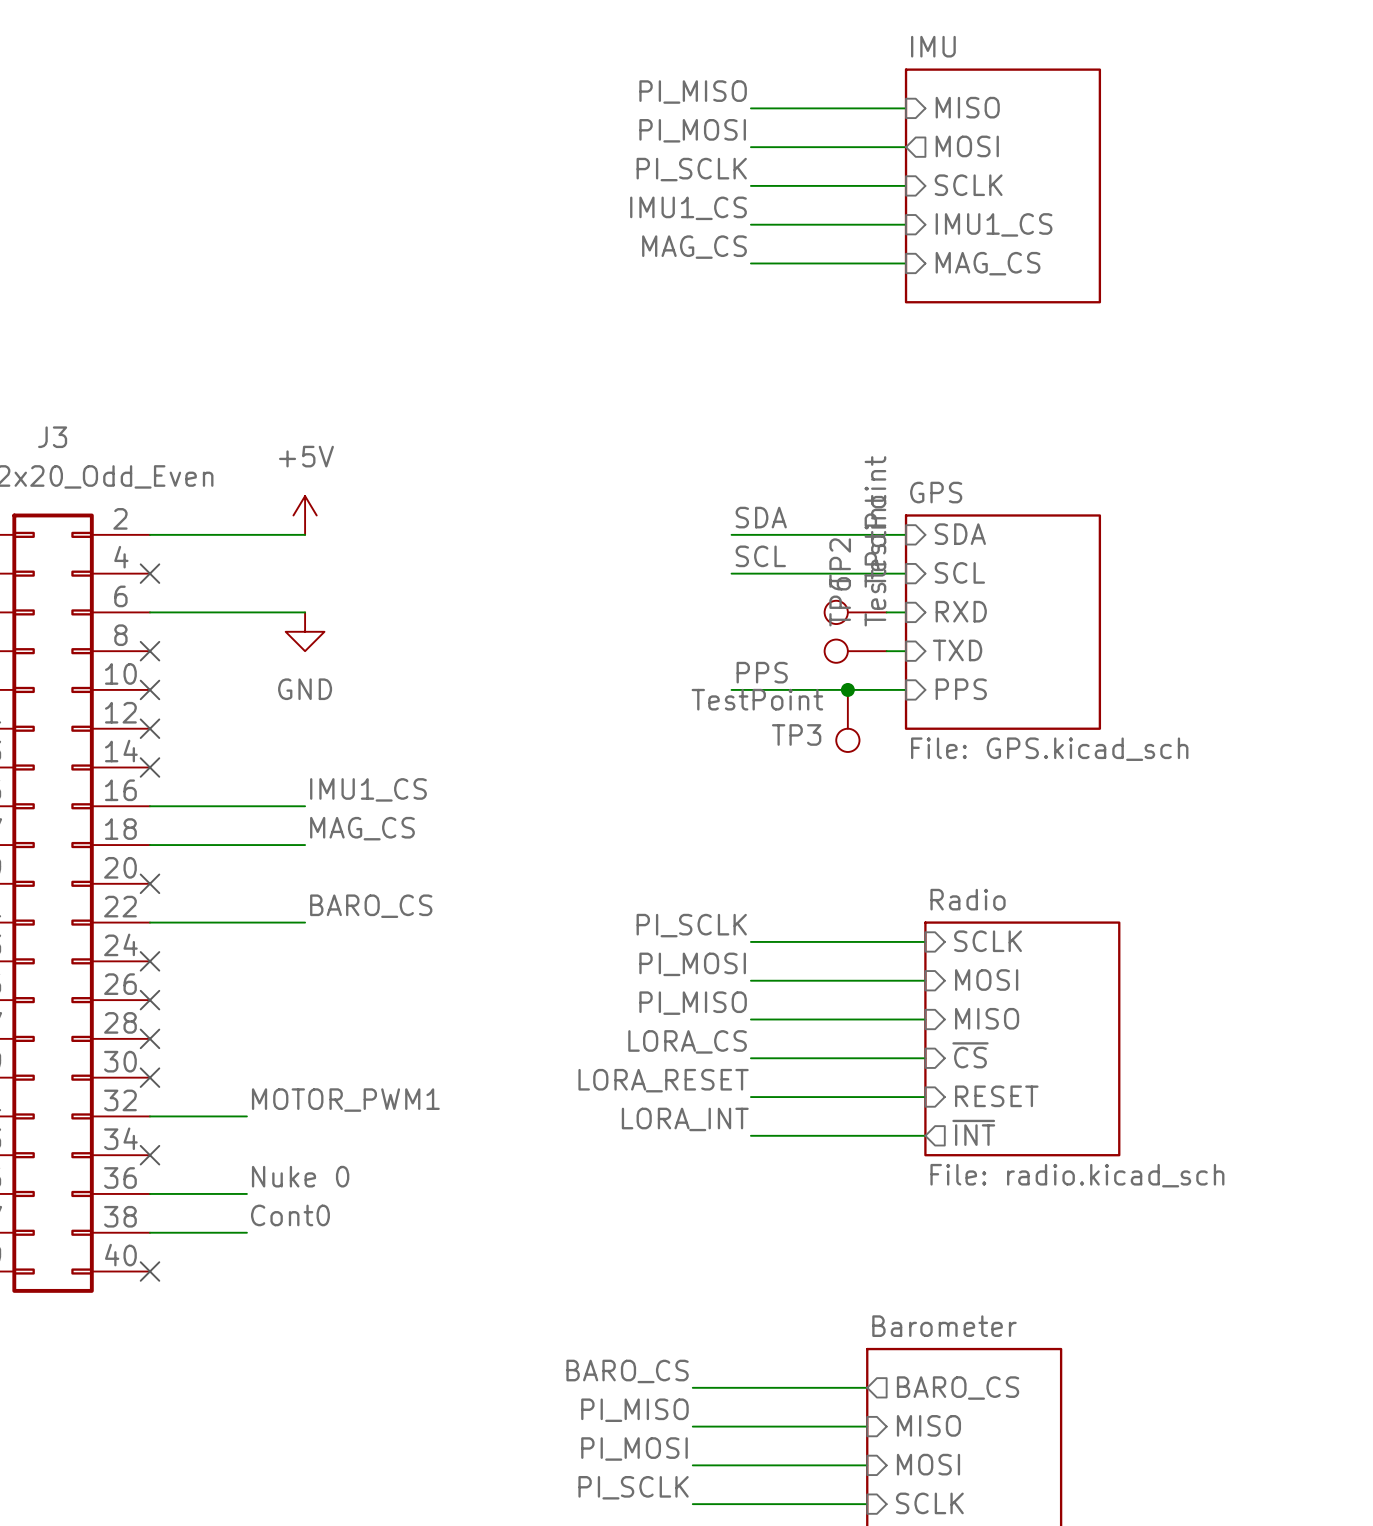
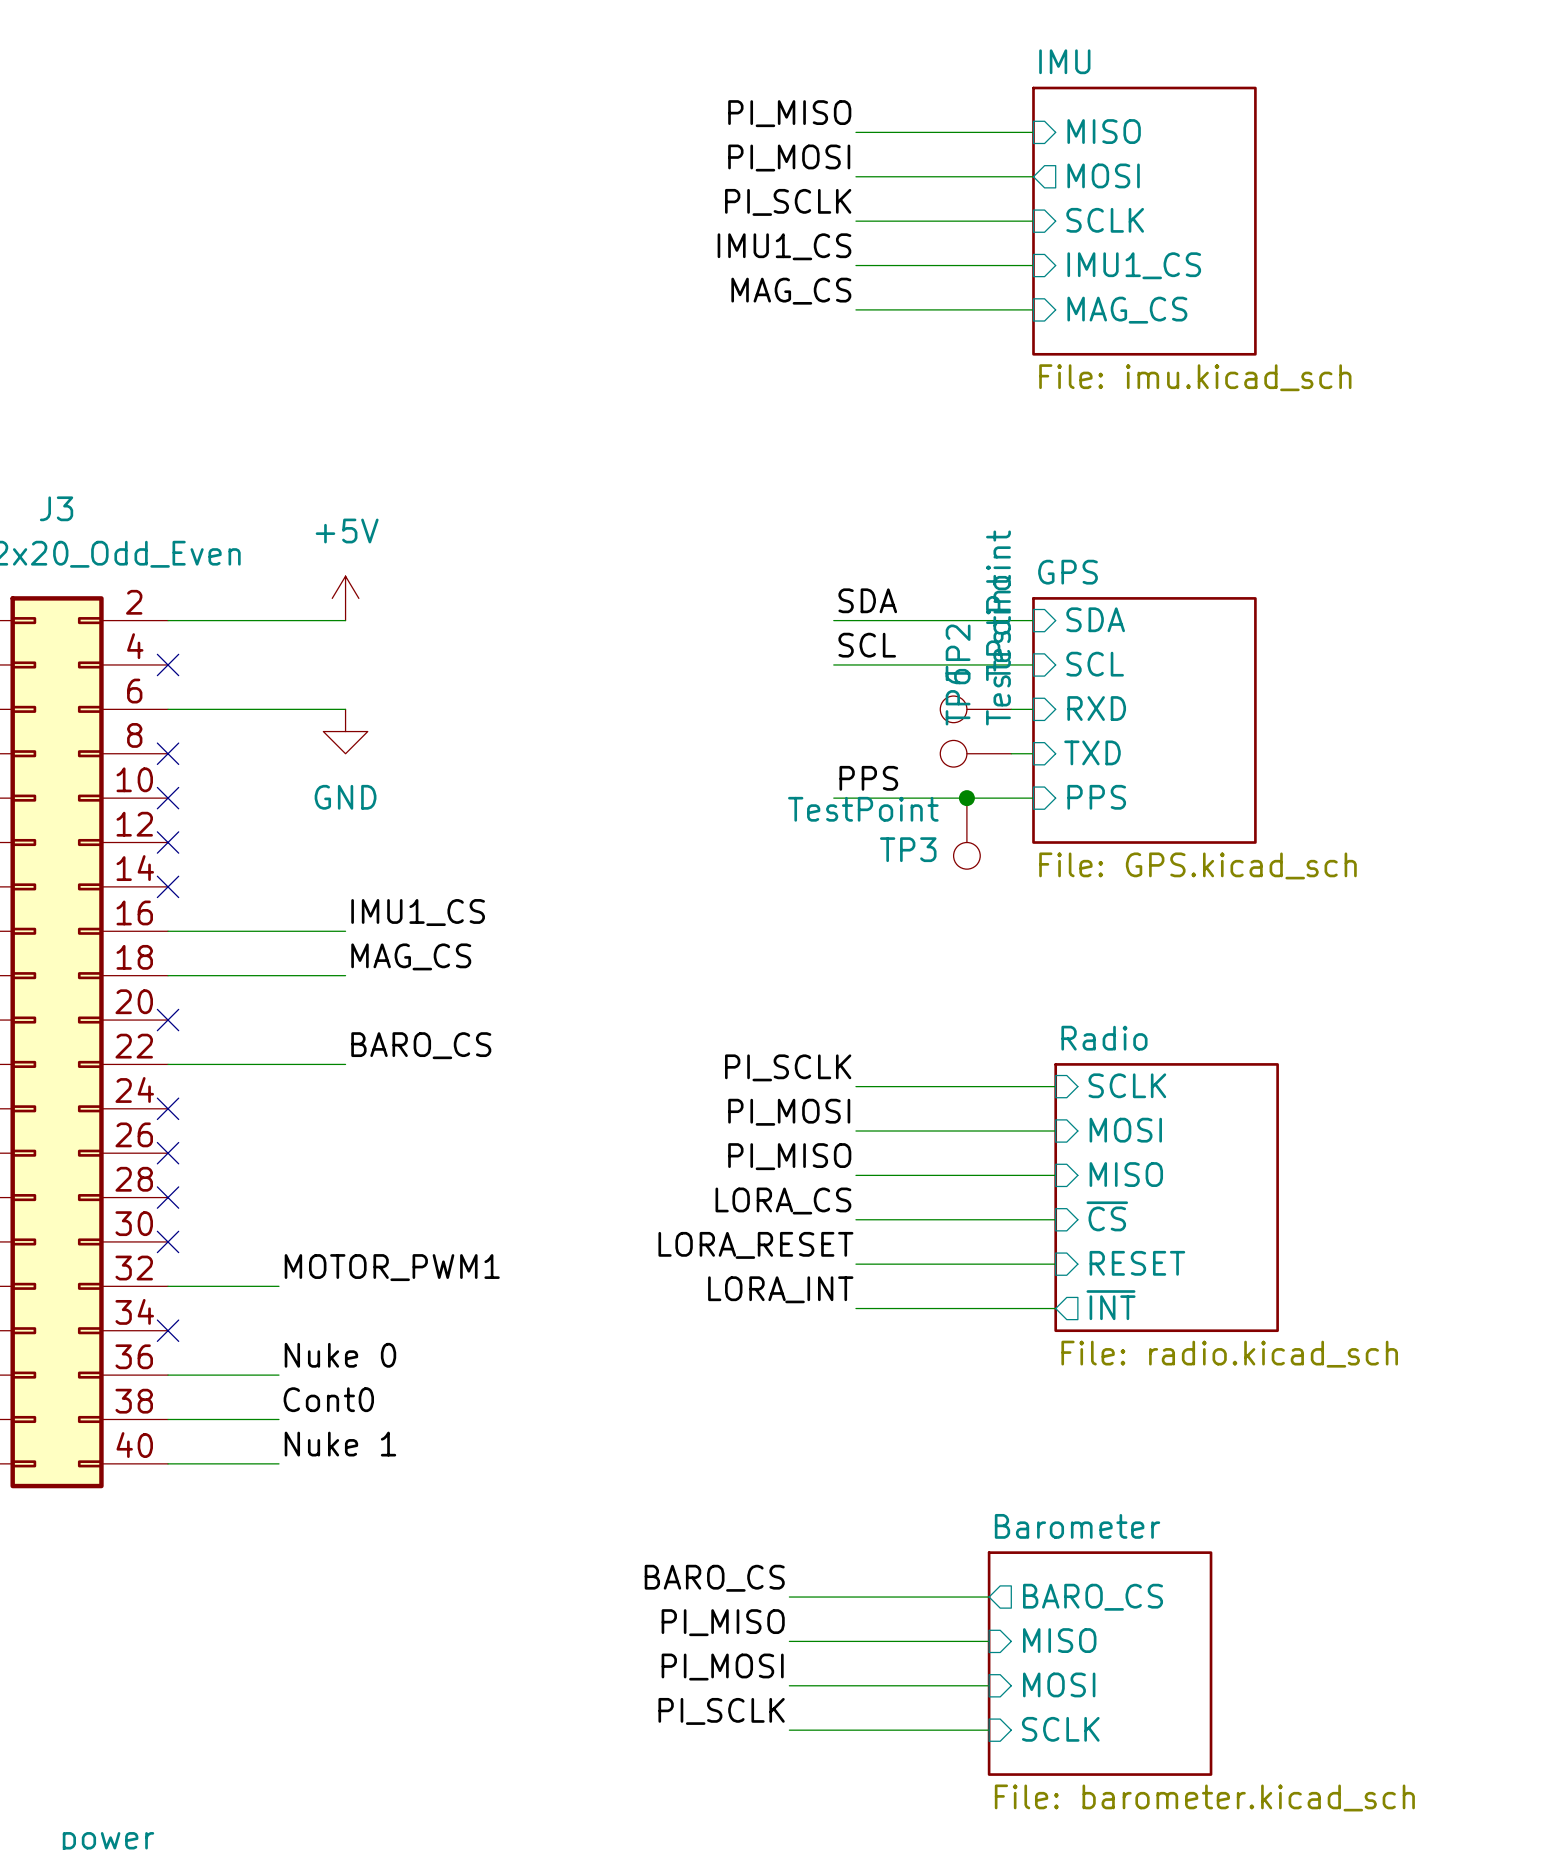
sheet IMU value: none -> File: imu.kicad_sch (1195, 377)
label: none -> Nuke 1 (340, 1444)
wire: none -> (168, 1463) (278, 1463)
no-connect mark: (149, 1271) -> none

